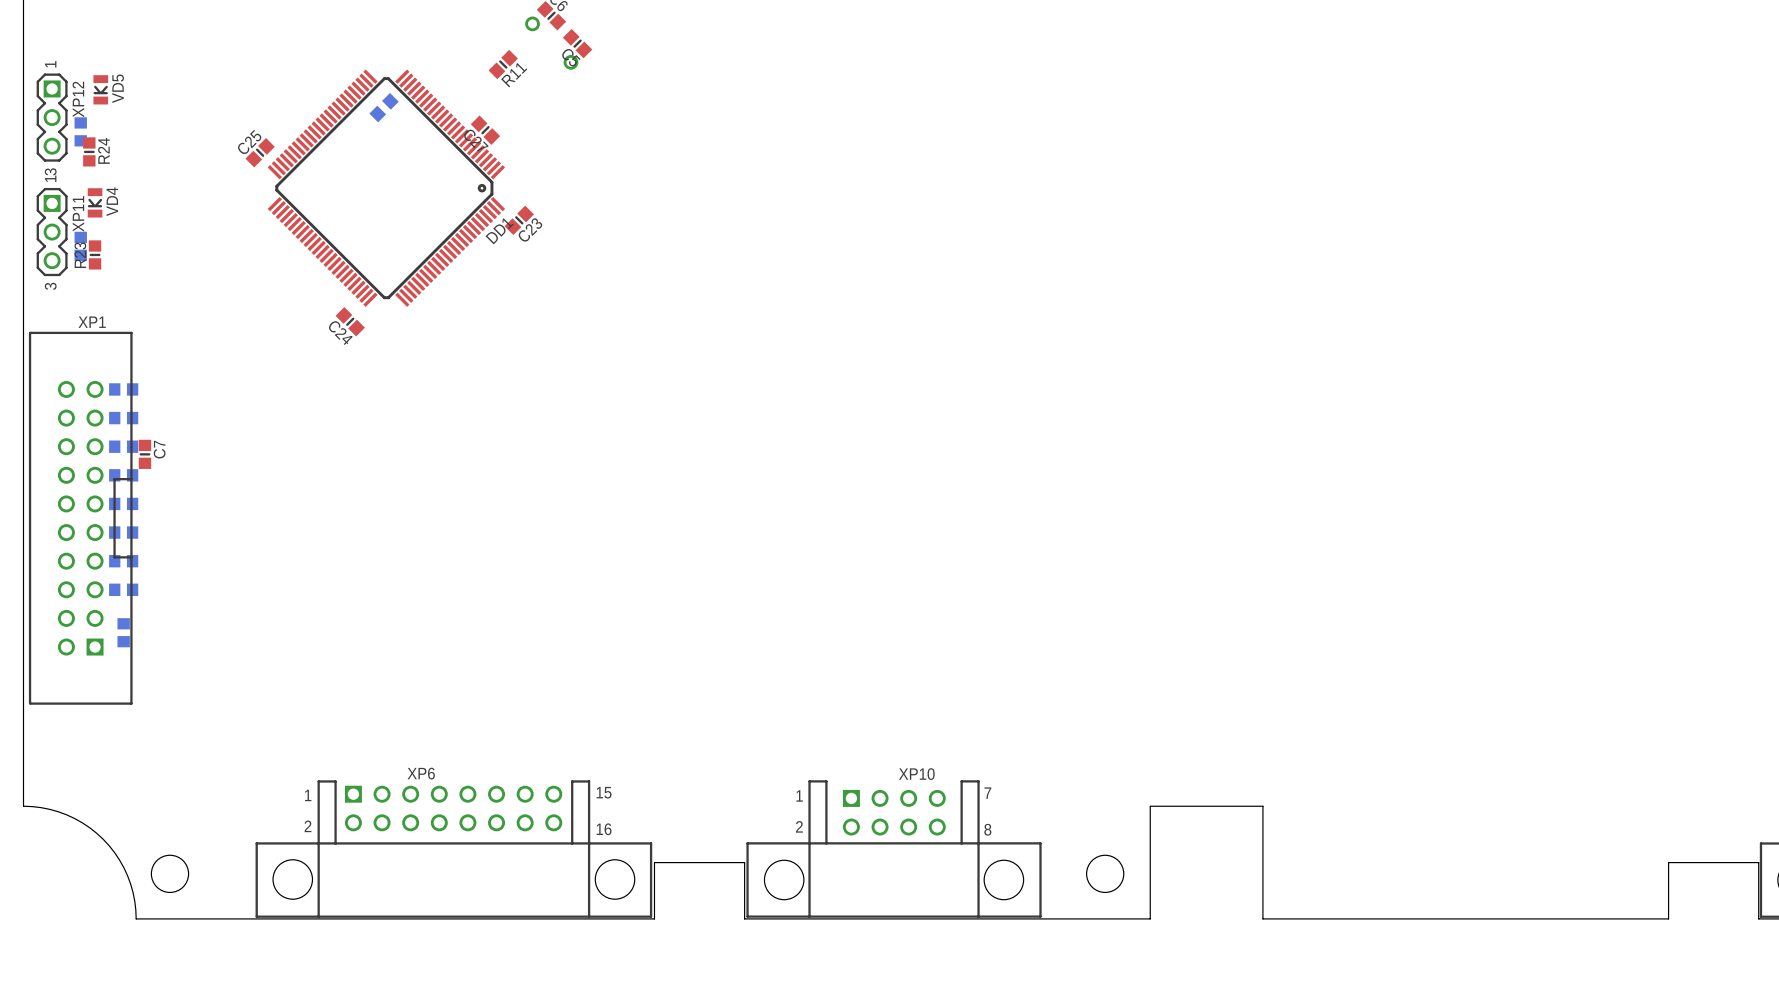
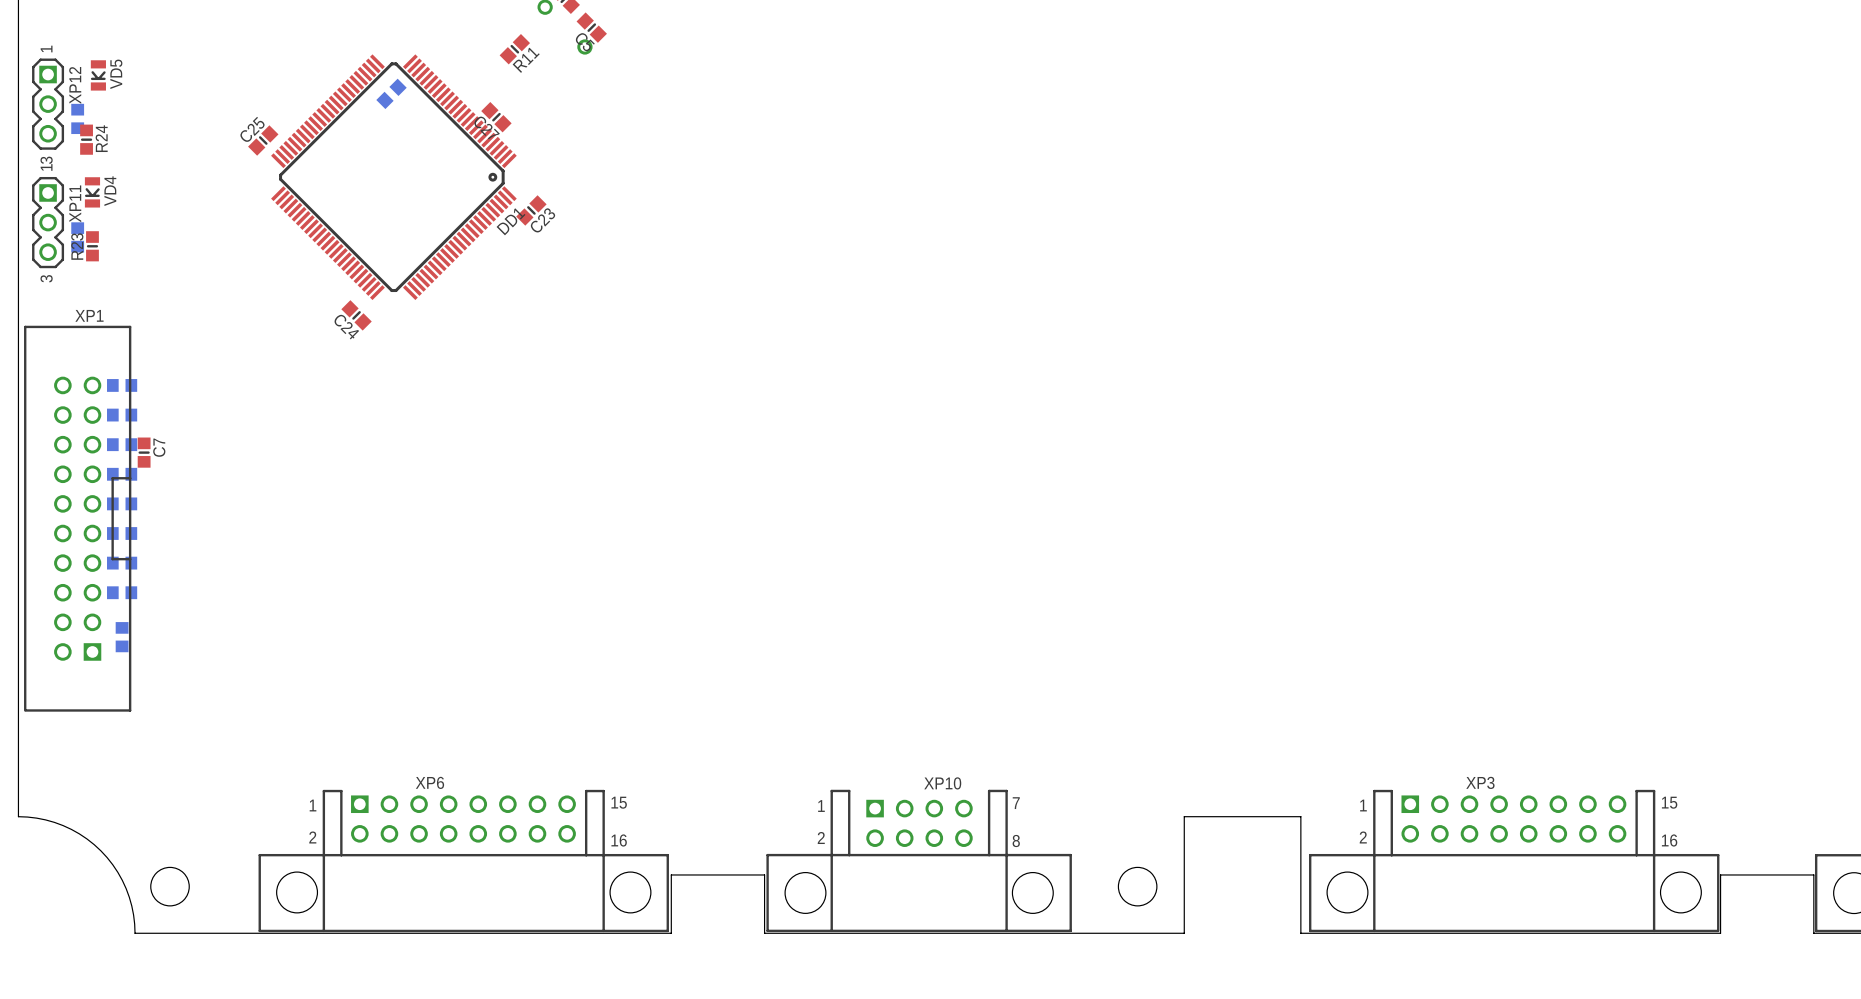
XP3: none -> (1514, 860)

